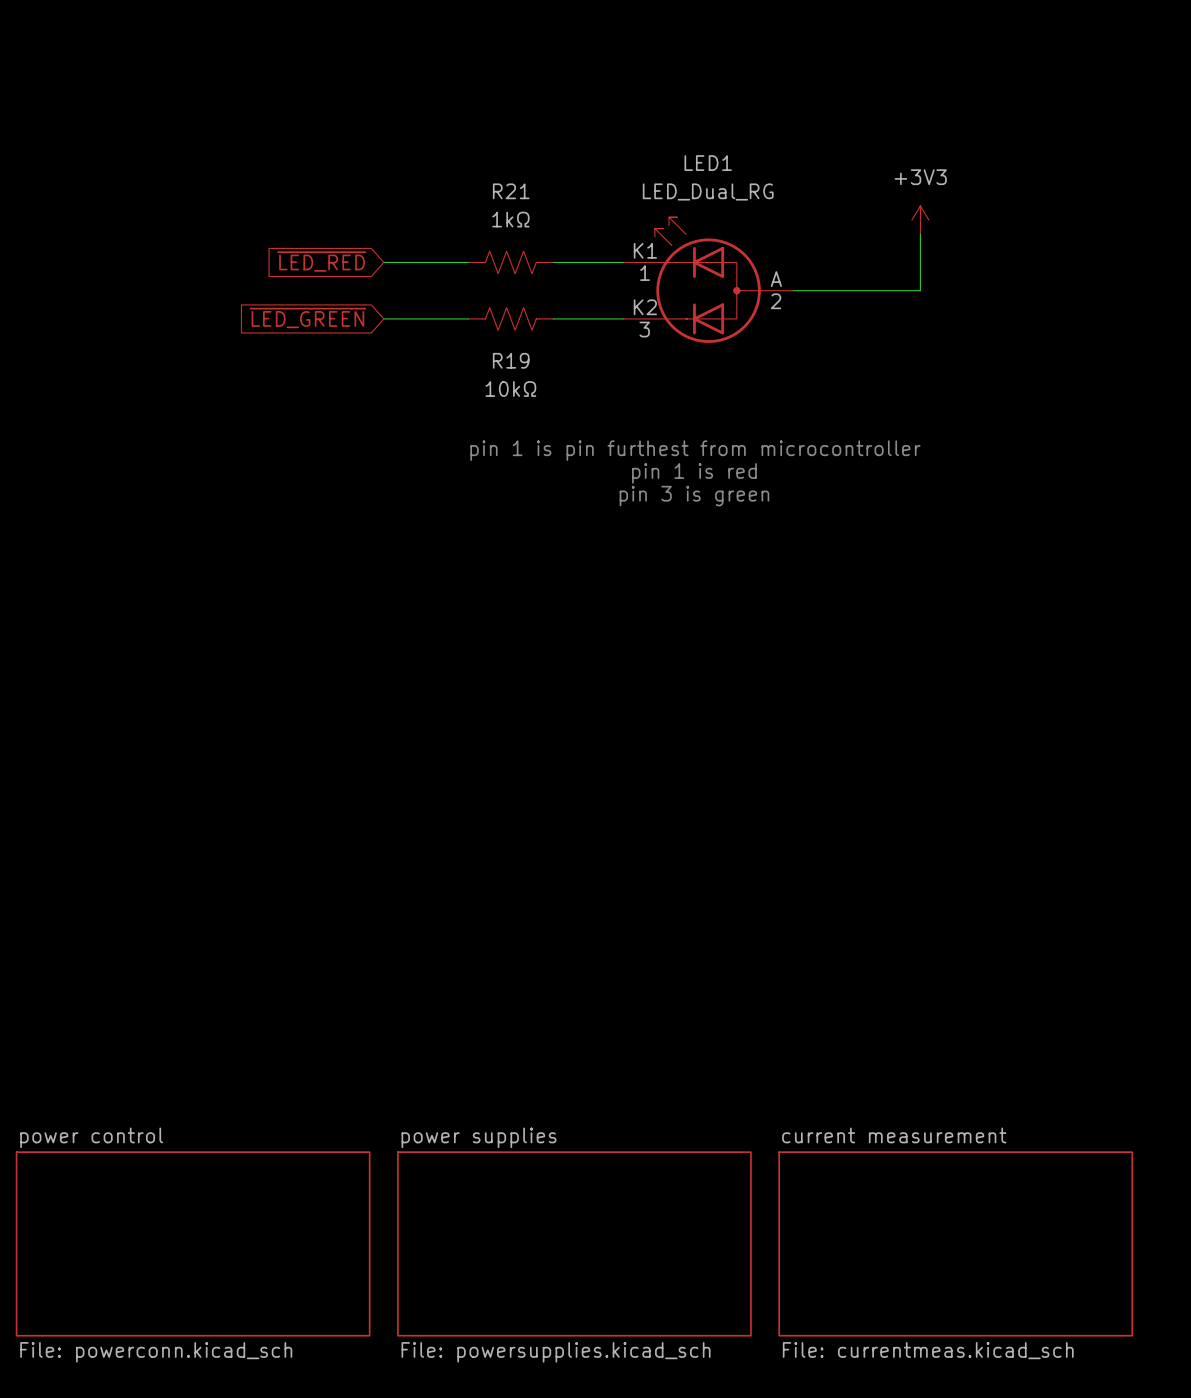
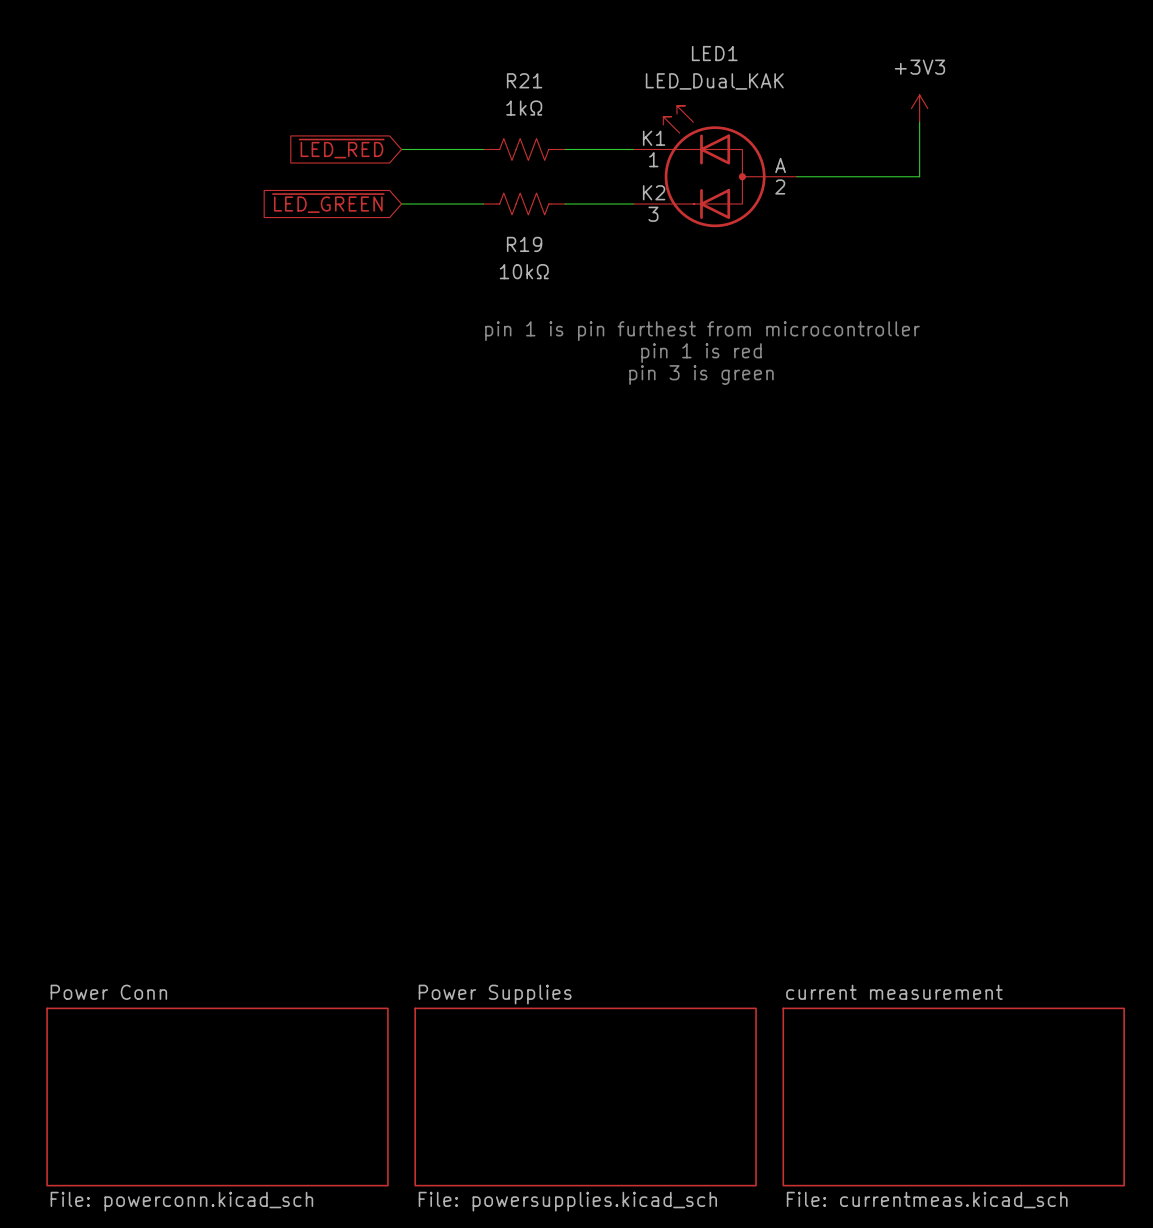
LED1 value: LED_Dual_RG (708, 191) -> LED_Dual_KAK (714, 81)
sheet power control name: power control (91, 1137) -> Power Conn (108, 992)
sheet power supplies name: power supplies (479, 1137) -> Power Supplies (495, 994)

